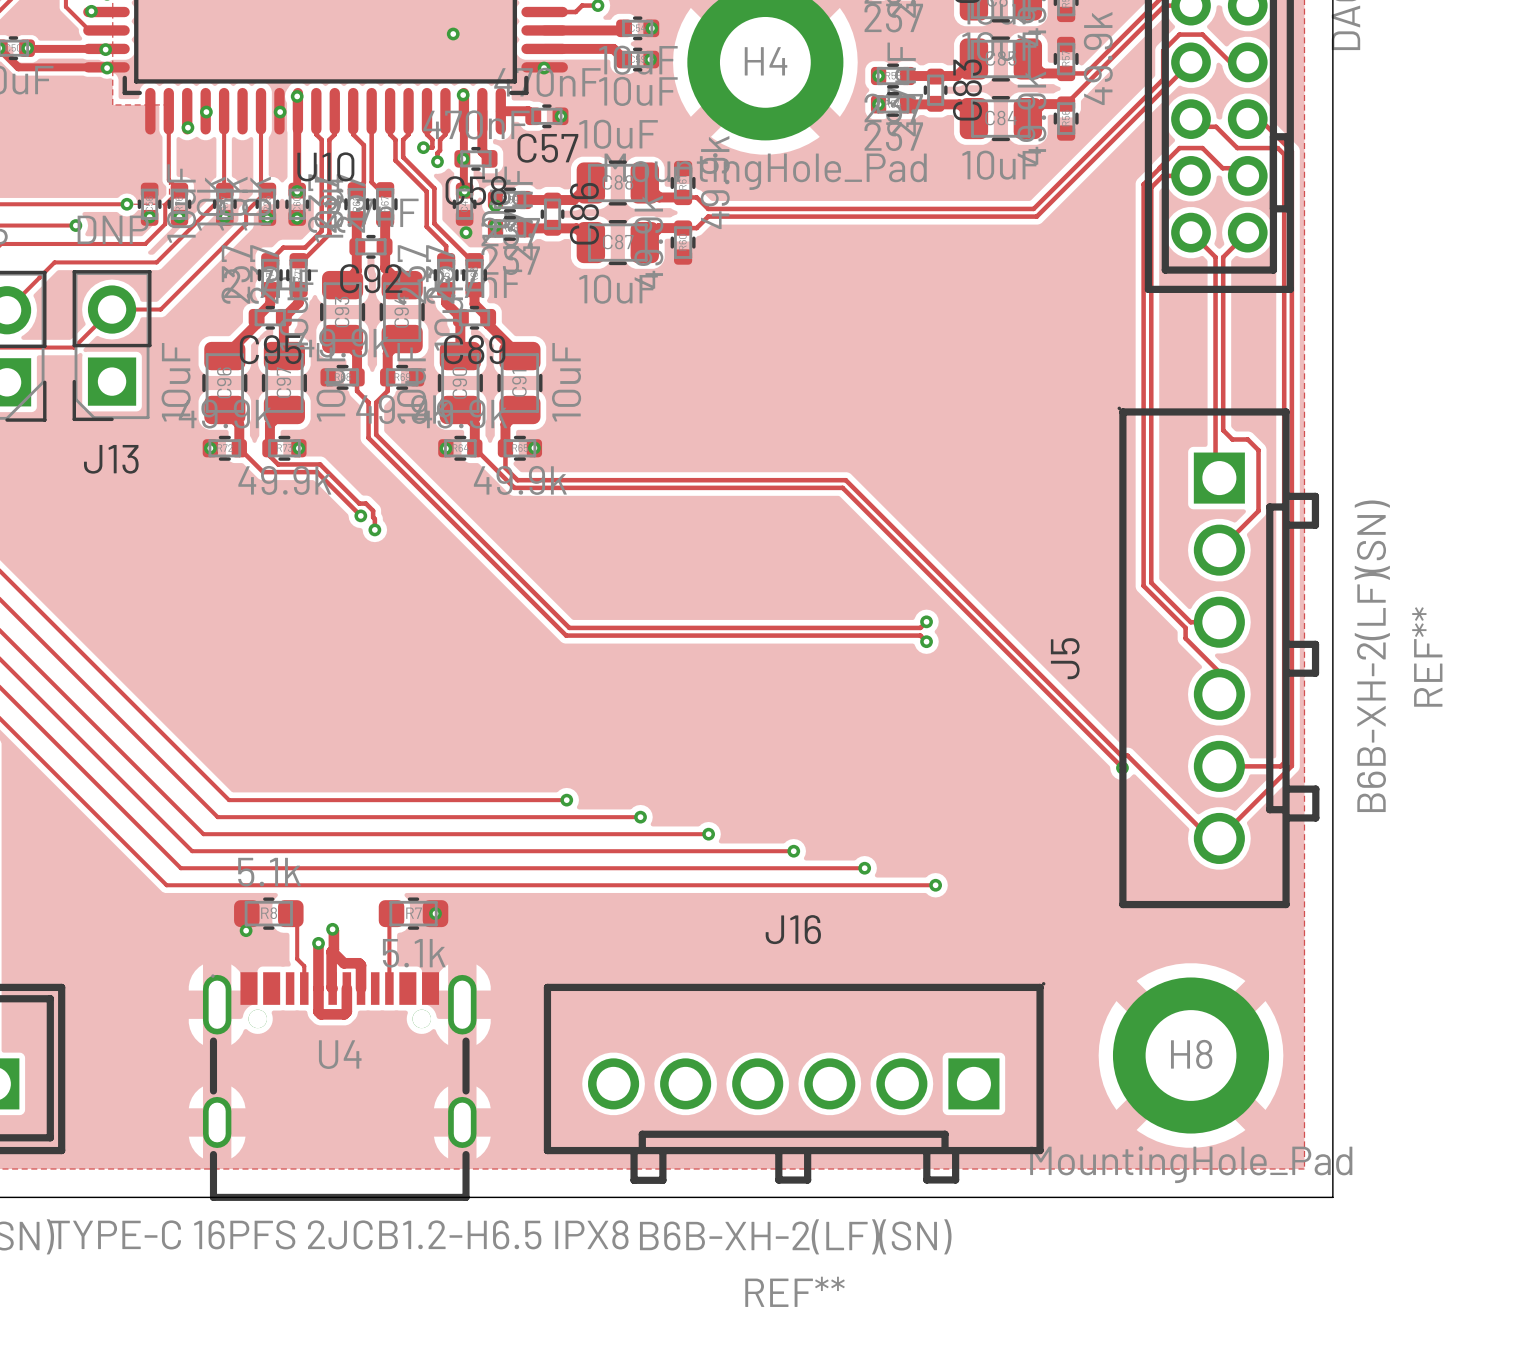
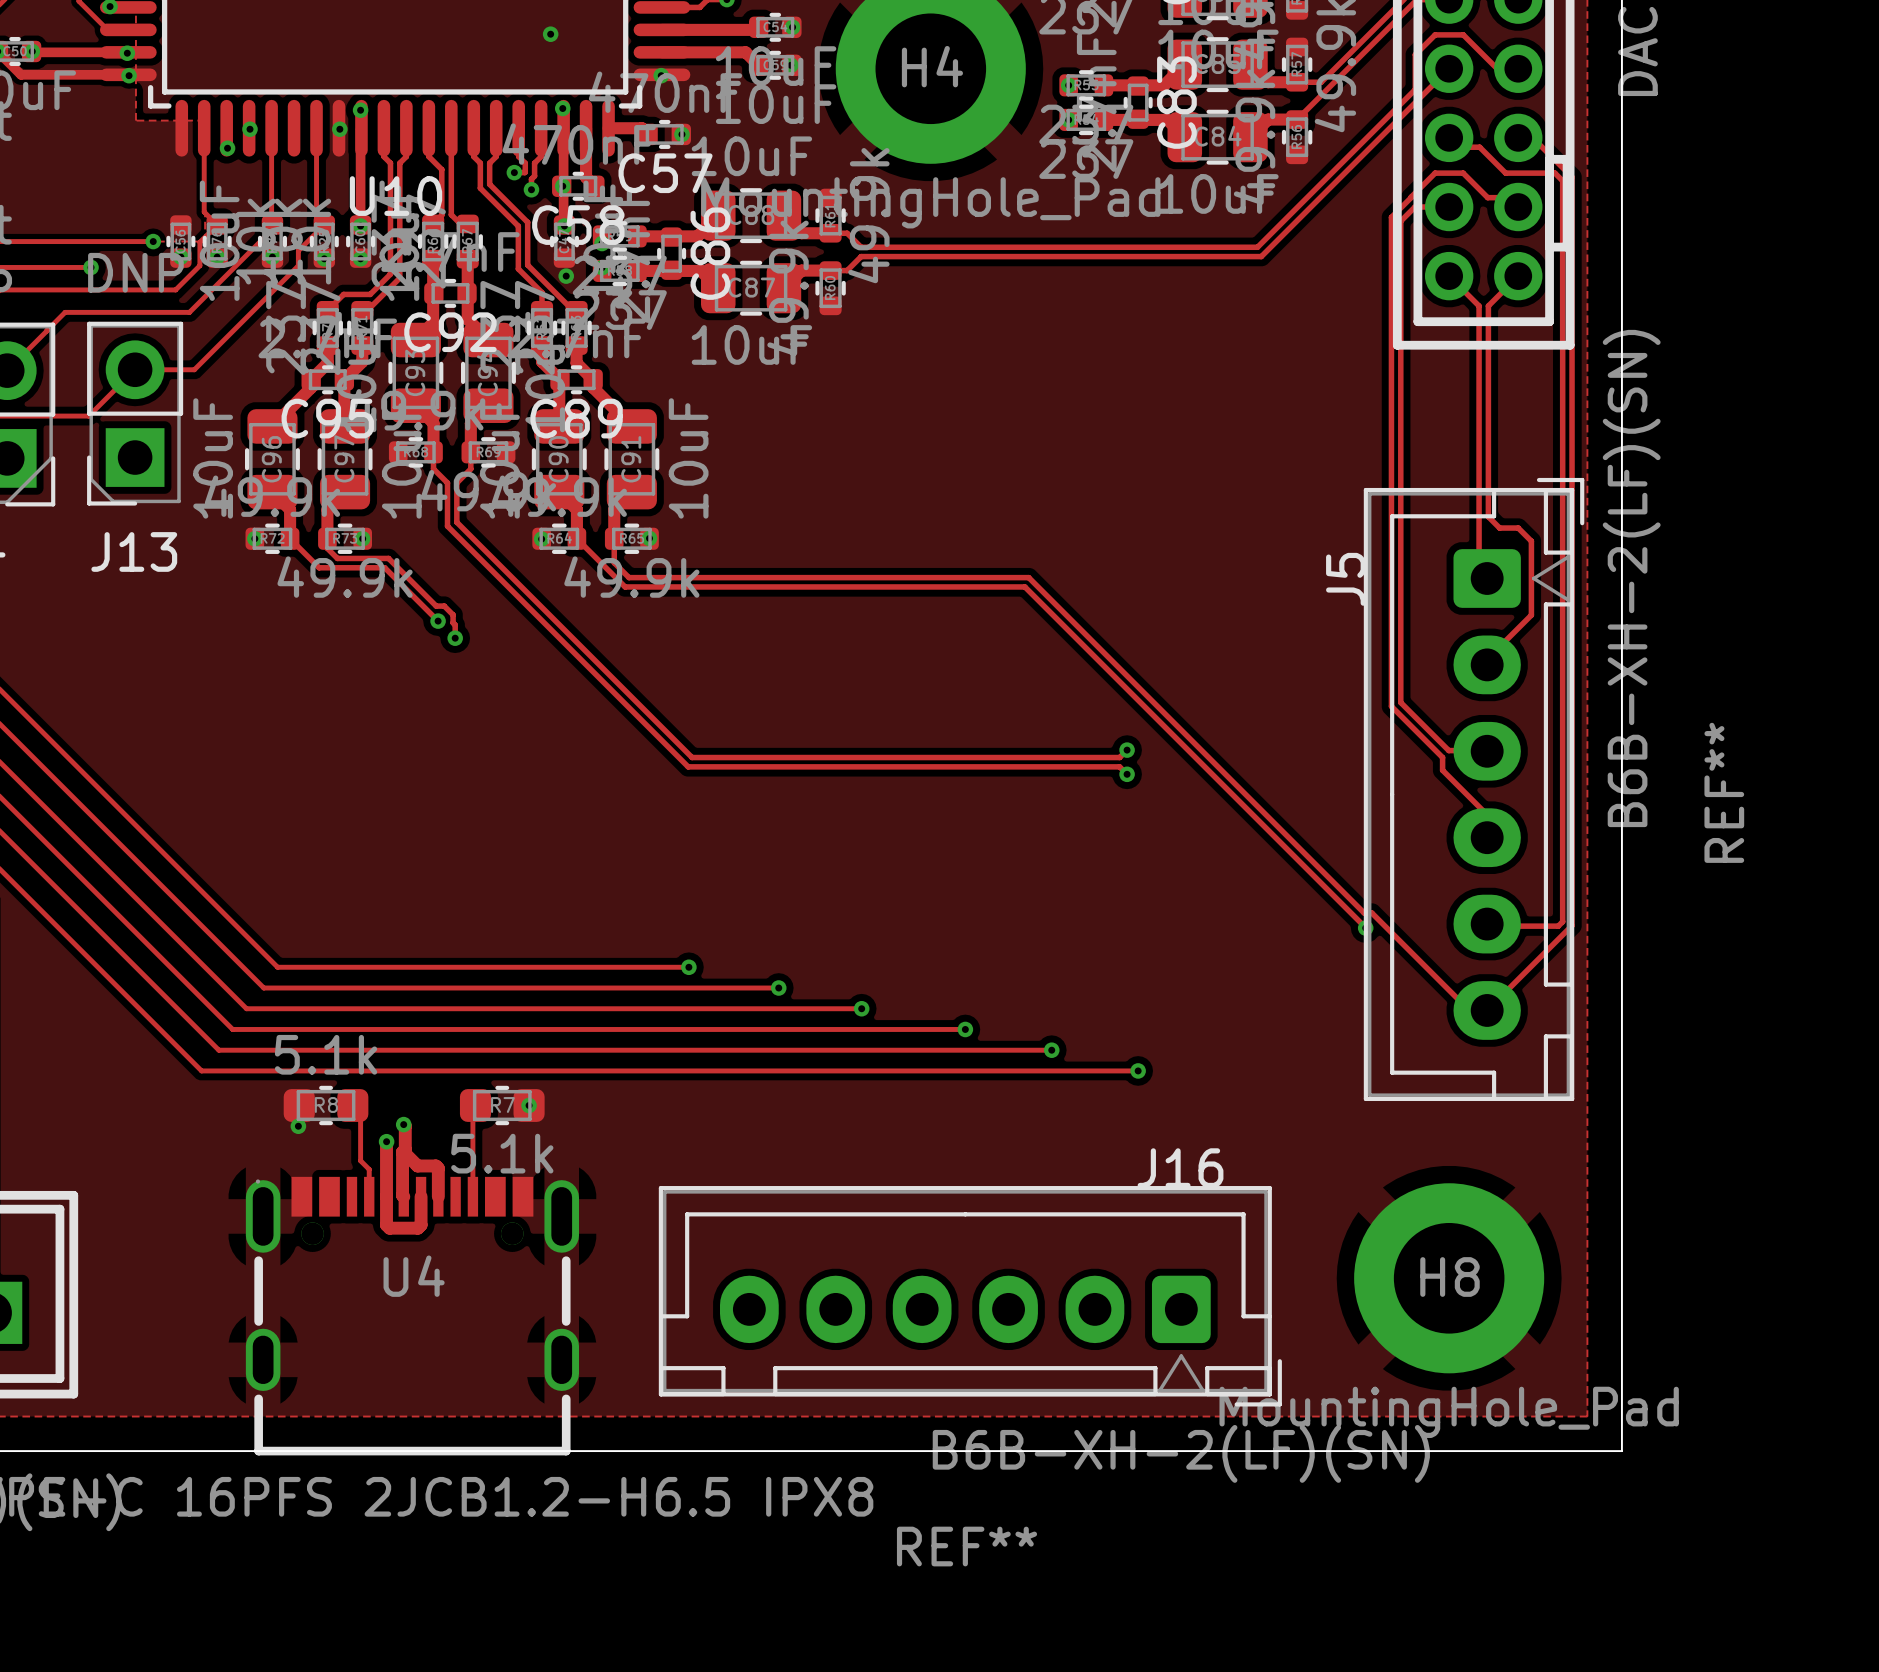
J5 footprint: [1117, 406, 1320, 909] -> [1363, 477, 1585, 1102]
J5 value position: B6B-XH-2(LF)(SN) (1372, 656) -> B6B-XH-2(LF)(SN) (1631, 578)
J5 name position: J5 (1065, 658) -> J5 (1345, 579)
J16 name position: J16 (793, 929) -> J16 (1180, 1168)
J16 footprint: [543, 982, 1046, 1184] -> [658, 1186, 1282, 1407]
J16 value position: B6B-XH-2(LF)(SN) (795, 1236) -> B6B-XH-2(LF)(SN) (1181, 1453)

